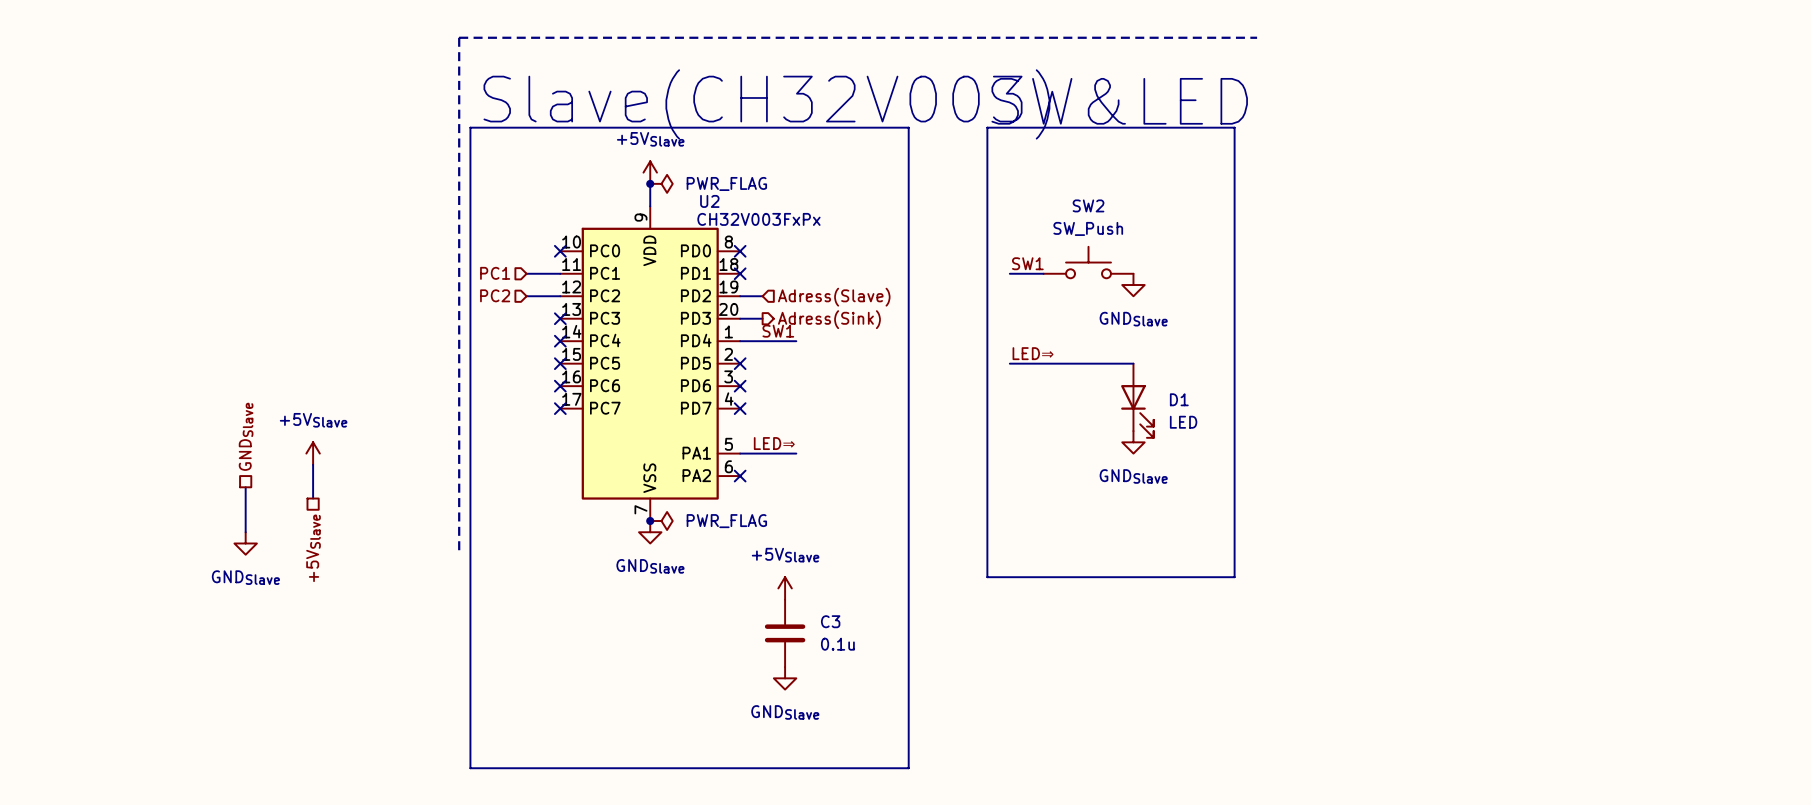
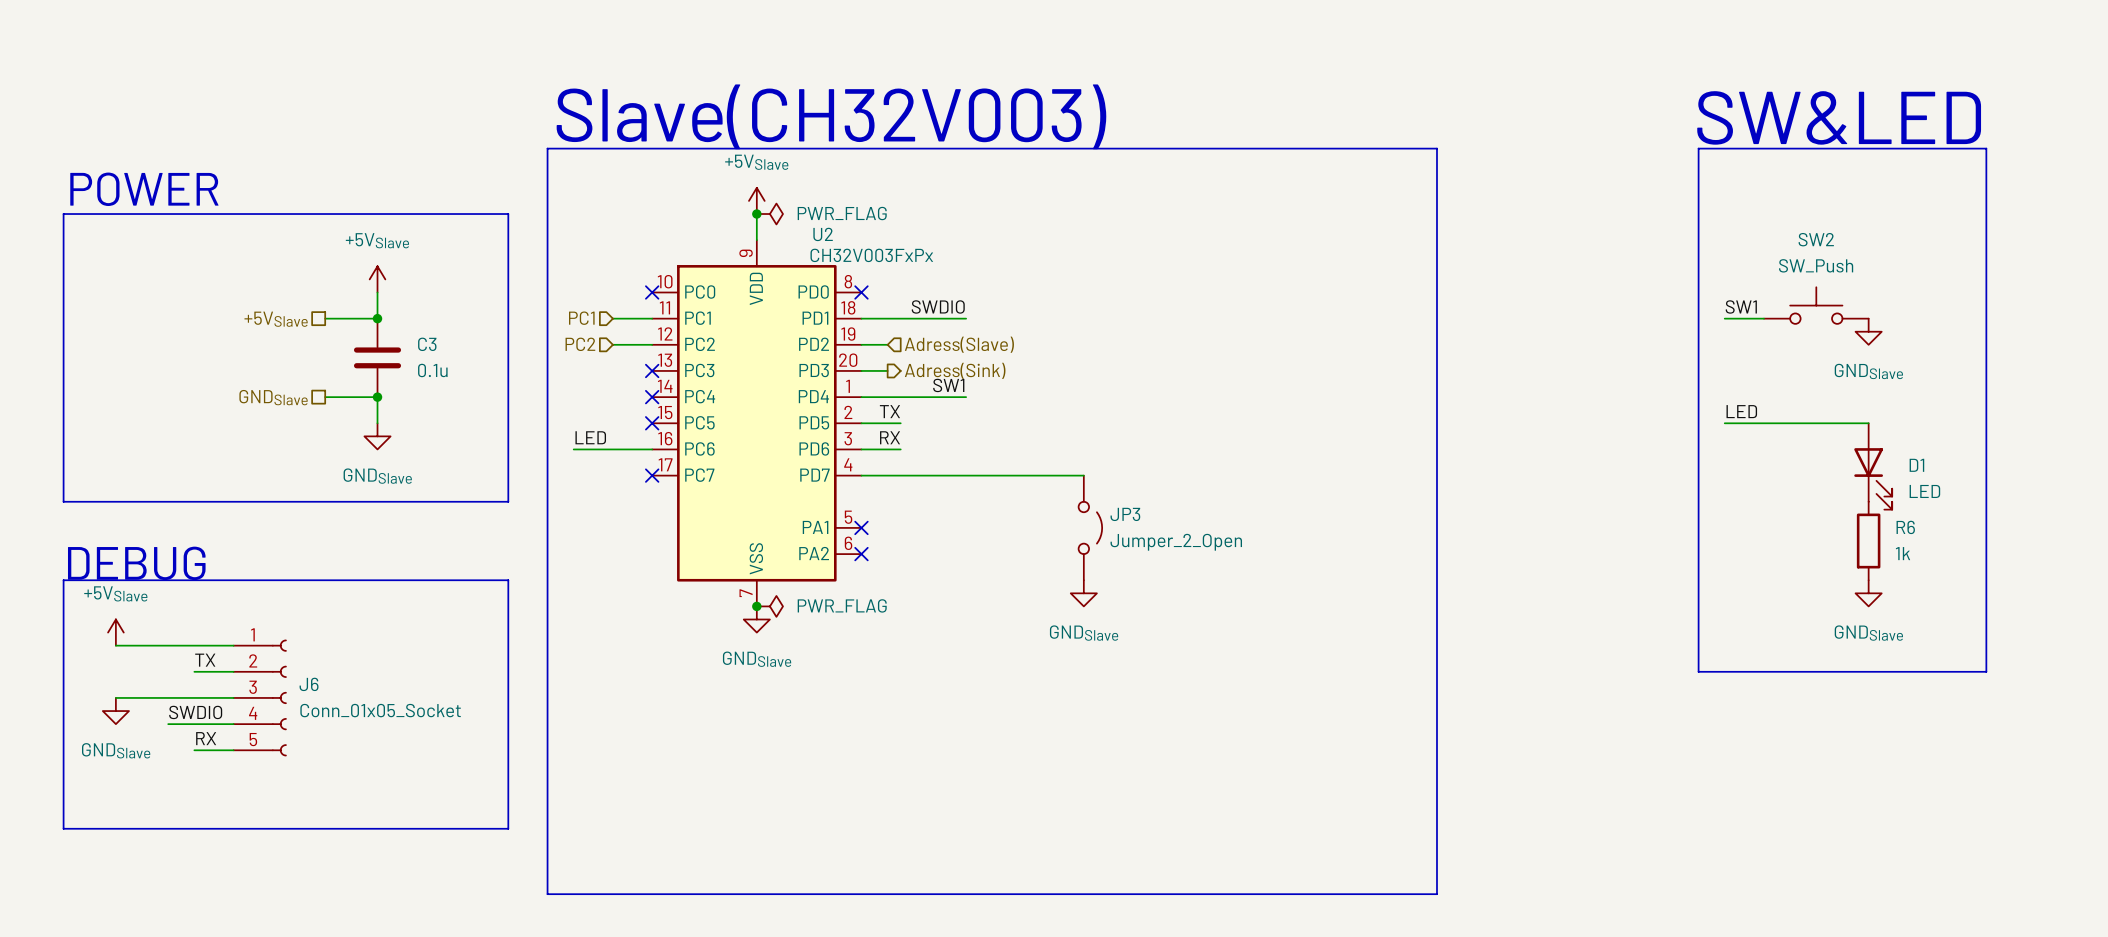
line: (1257, 37) (459, 37) (459, 554) -> none
text: SW&LED (1119, 101) -> none
text: none -> SW&LED (1839, 117)
line: (908, 127) (908, 768) -> (1436, 671) (1436, 894) (1057, 894)
line: (987, 127) (987, 577) (1234, 577) -> (1149, 148) (1057, 148)
line: none -> (1698, 148) (1986, 148) (1986, 671) (1698, 671) (1698, 148)
text: none -> POWER (144, 189)
line: none -> (63, 214) (63, 501) (508, 501) (508, 214) (63, 214)
power symbol: none -> +5VSlave (377, 279)
wire: none -> (377, 292) (377, 318) (325, 318)
SW2 position: (1088, 262) -> (1816, 305)
label: none -> SWDIO (938, 306)
label: SW1 (1027, 263) -> none
label: none -> SW1 (1741, 306)
junction: none -> (377, 318)
wire: none -> (861, 318) (966, 318)
no-connect mark: (740, 273) -> none
wire: (1009, 273) (1043, 273) -> none
wire: none -> (1724, 318) (1763, 318)
hierarchical label: none -> +5VSlave (276, 319)
power symbol: GNDSlave (1133, 285) -> none
power symbol: none -> GNDSlave (1868, 331)
label position: SW1 (778, 331) -> SW1 (948, 385)
wire: none -> (325, 397) (377, 397) (377, 423)
junction: none -> (377, 397)
wire: none -> (926, 397) (966, 397)
label: none -> TX (889, 411)
label: LED⇒ (1033, 353) -> none
label: none -> LED (1741, 411)
wire: none -> (861, 423) (900, 423)
no-connect mark: (740, 363) -> none
wire: (1009, 363) (1133, 363) -> none
wire: none -> (1724, 423) (1868, 423)
power symbol: none -> GNDSlave (377, 436)
label: none -> LED (590, 437)
label: none -> RX (890, 437)
wire: none -> (573, 449) (652, 449)
no-connect mark: (560, 386) -> none
wire: none -> (861, 449) (900, 449)
no-connect mark: (740, 386) -> none
D1 position: (1137, 400) -> (1873, 466)
wire: none -> (861, 475) (1083, 475)
no-connect mark: (740, 408) -> none
hierarchical label rotation: 0° (246, 436) -> 90° counterclockwise (273, 397)
power symbol: GNDSlave (1133, 442) -> none
label: LED⇒ (774, 443) -> none
power symbol: +5VSlave (313, 453) -> none
wire: (740, 453) (796, 453) -> none
no-connect mark: none -> (861, 527)
JP3: none -> Jumper_2_Open (1090, 527)
wire: (313, 464) (313, 498) -> none
R6: none -> 1k (1868, 541)
text: none -> DEBUG (136, 563)
wire: (245, 487) (245, 532) -> none
line: none -> (63, 580) (508, 580) (508, 828) (63, 828) (63, 580)
power symbol: none -> GNDSlave (1083, 593)
power symbol: none -> GNDSlave (1868, 593)
power symbol: none -> +5VSlave (115, 632)
power symbol: GNDSlave (245, 543) -> none
hierarchical label: +5VSlave (313, 548) -> none
wire: none -> (115, 645) (233, 645)
label: none -> TX (205, 660)
wire: none -> (194, 671) (233, 671)
power symbol: +5VSlave (785, 588) -> none
wire: none -> (115, 697) (233, 697)
J6: none -> Conn_01x05_Socket (260, 697)
power symbol: none -> GNDSlave (115, 711)
label: none -> SWDIO (195, 712)
wire: none -> (168, 724) (233, 724)
C3 position: (785, 633) -> (377, 357)
label: none -> RX (206, 738)
wire: none -> (194, 750) (233, 750)
power symbol: GNDSlave (785, 678) -> none

